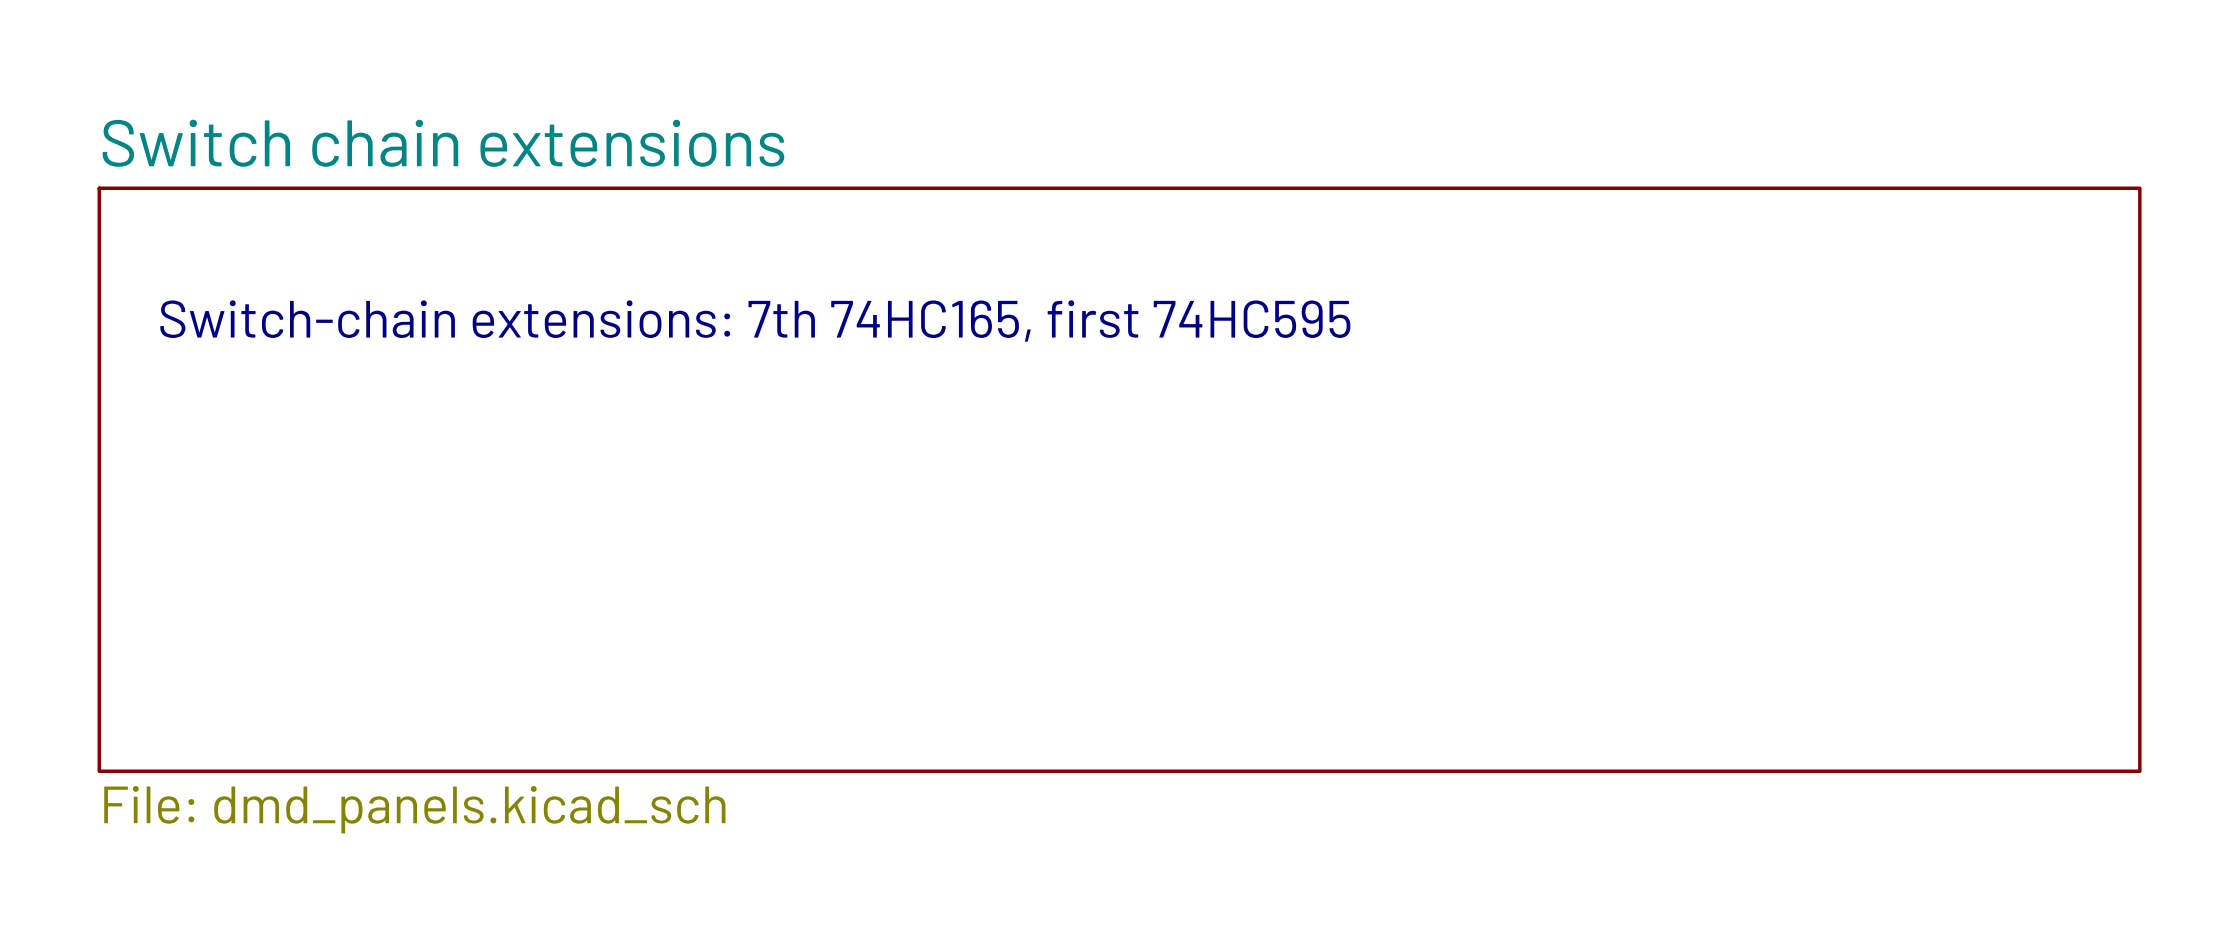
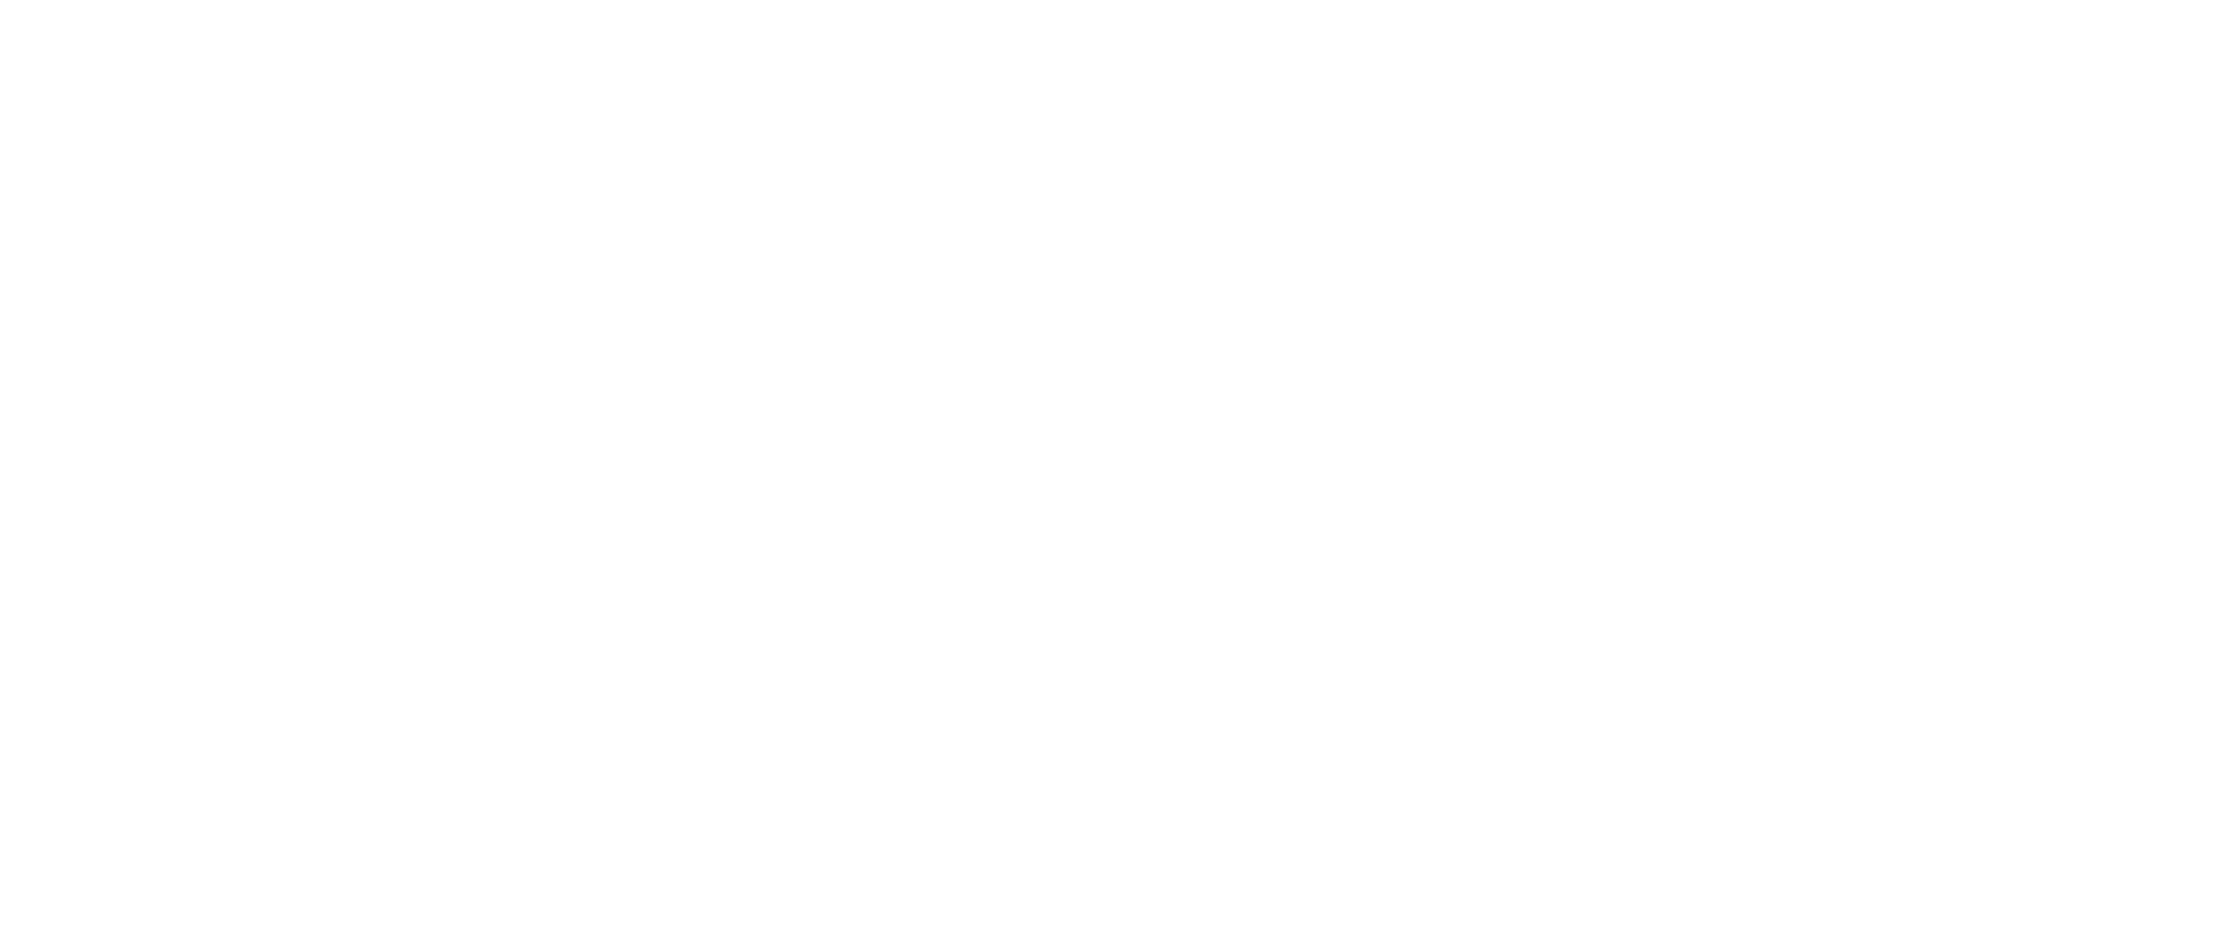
text: Switch-chain extensions: 7th 74HC165, first 74HC595 (755, 321) -> none
sheet Switch chain extensions: File: dmd_panels.kicad_sch (1119, 479) -> none

